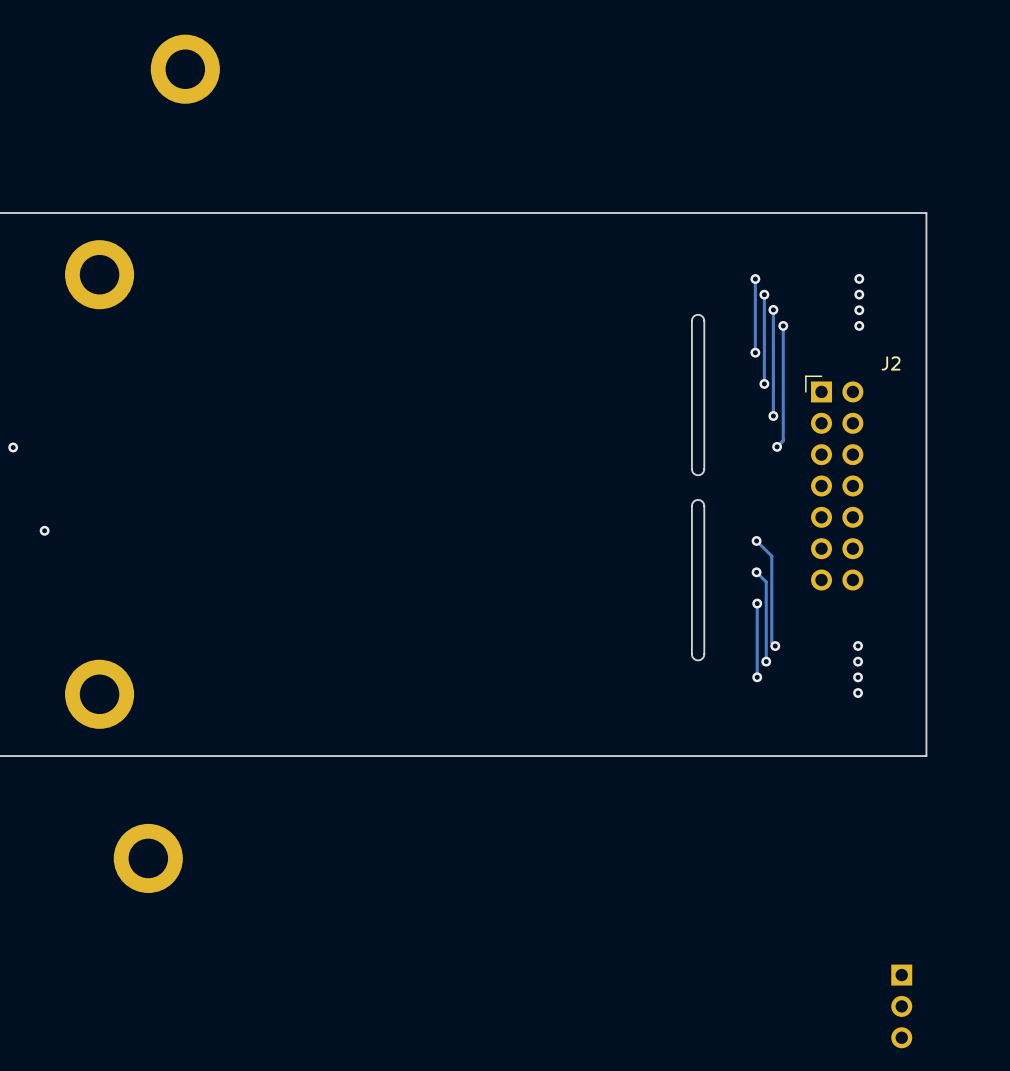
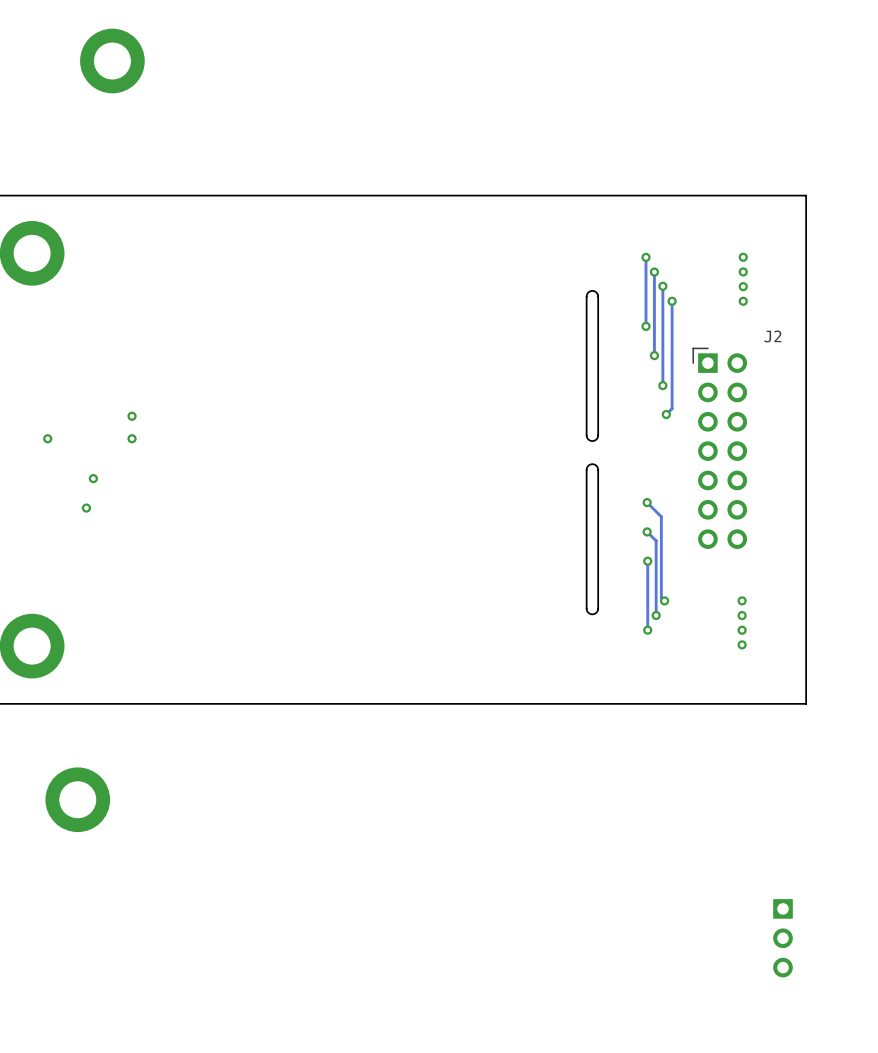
via: none -> (132, 416)
via: none -> (47, 438)
via: none -> (132, 438)
via: none -> (93, 478)
via: none -> (86, 508)

